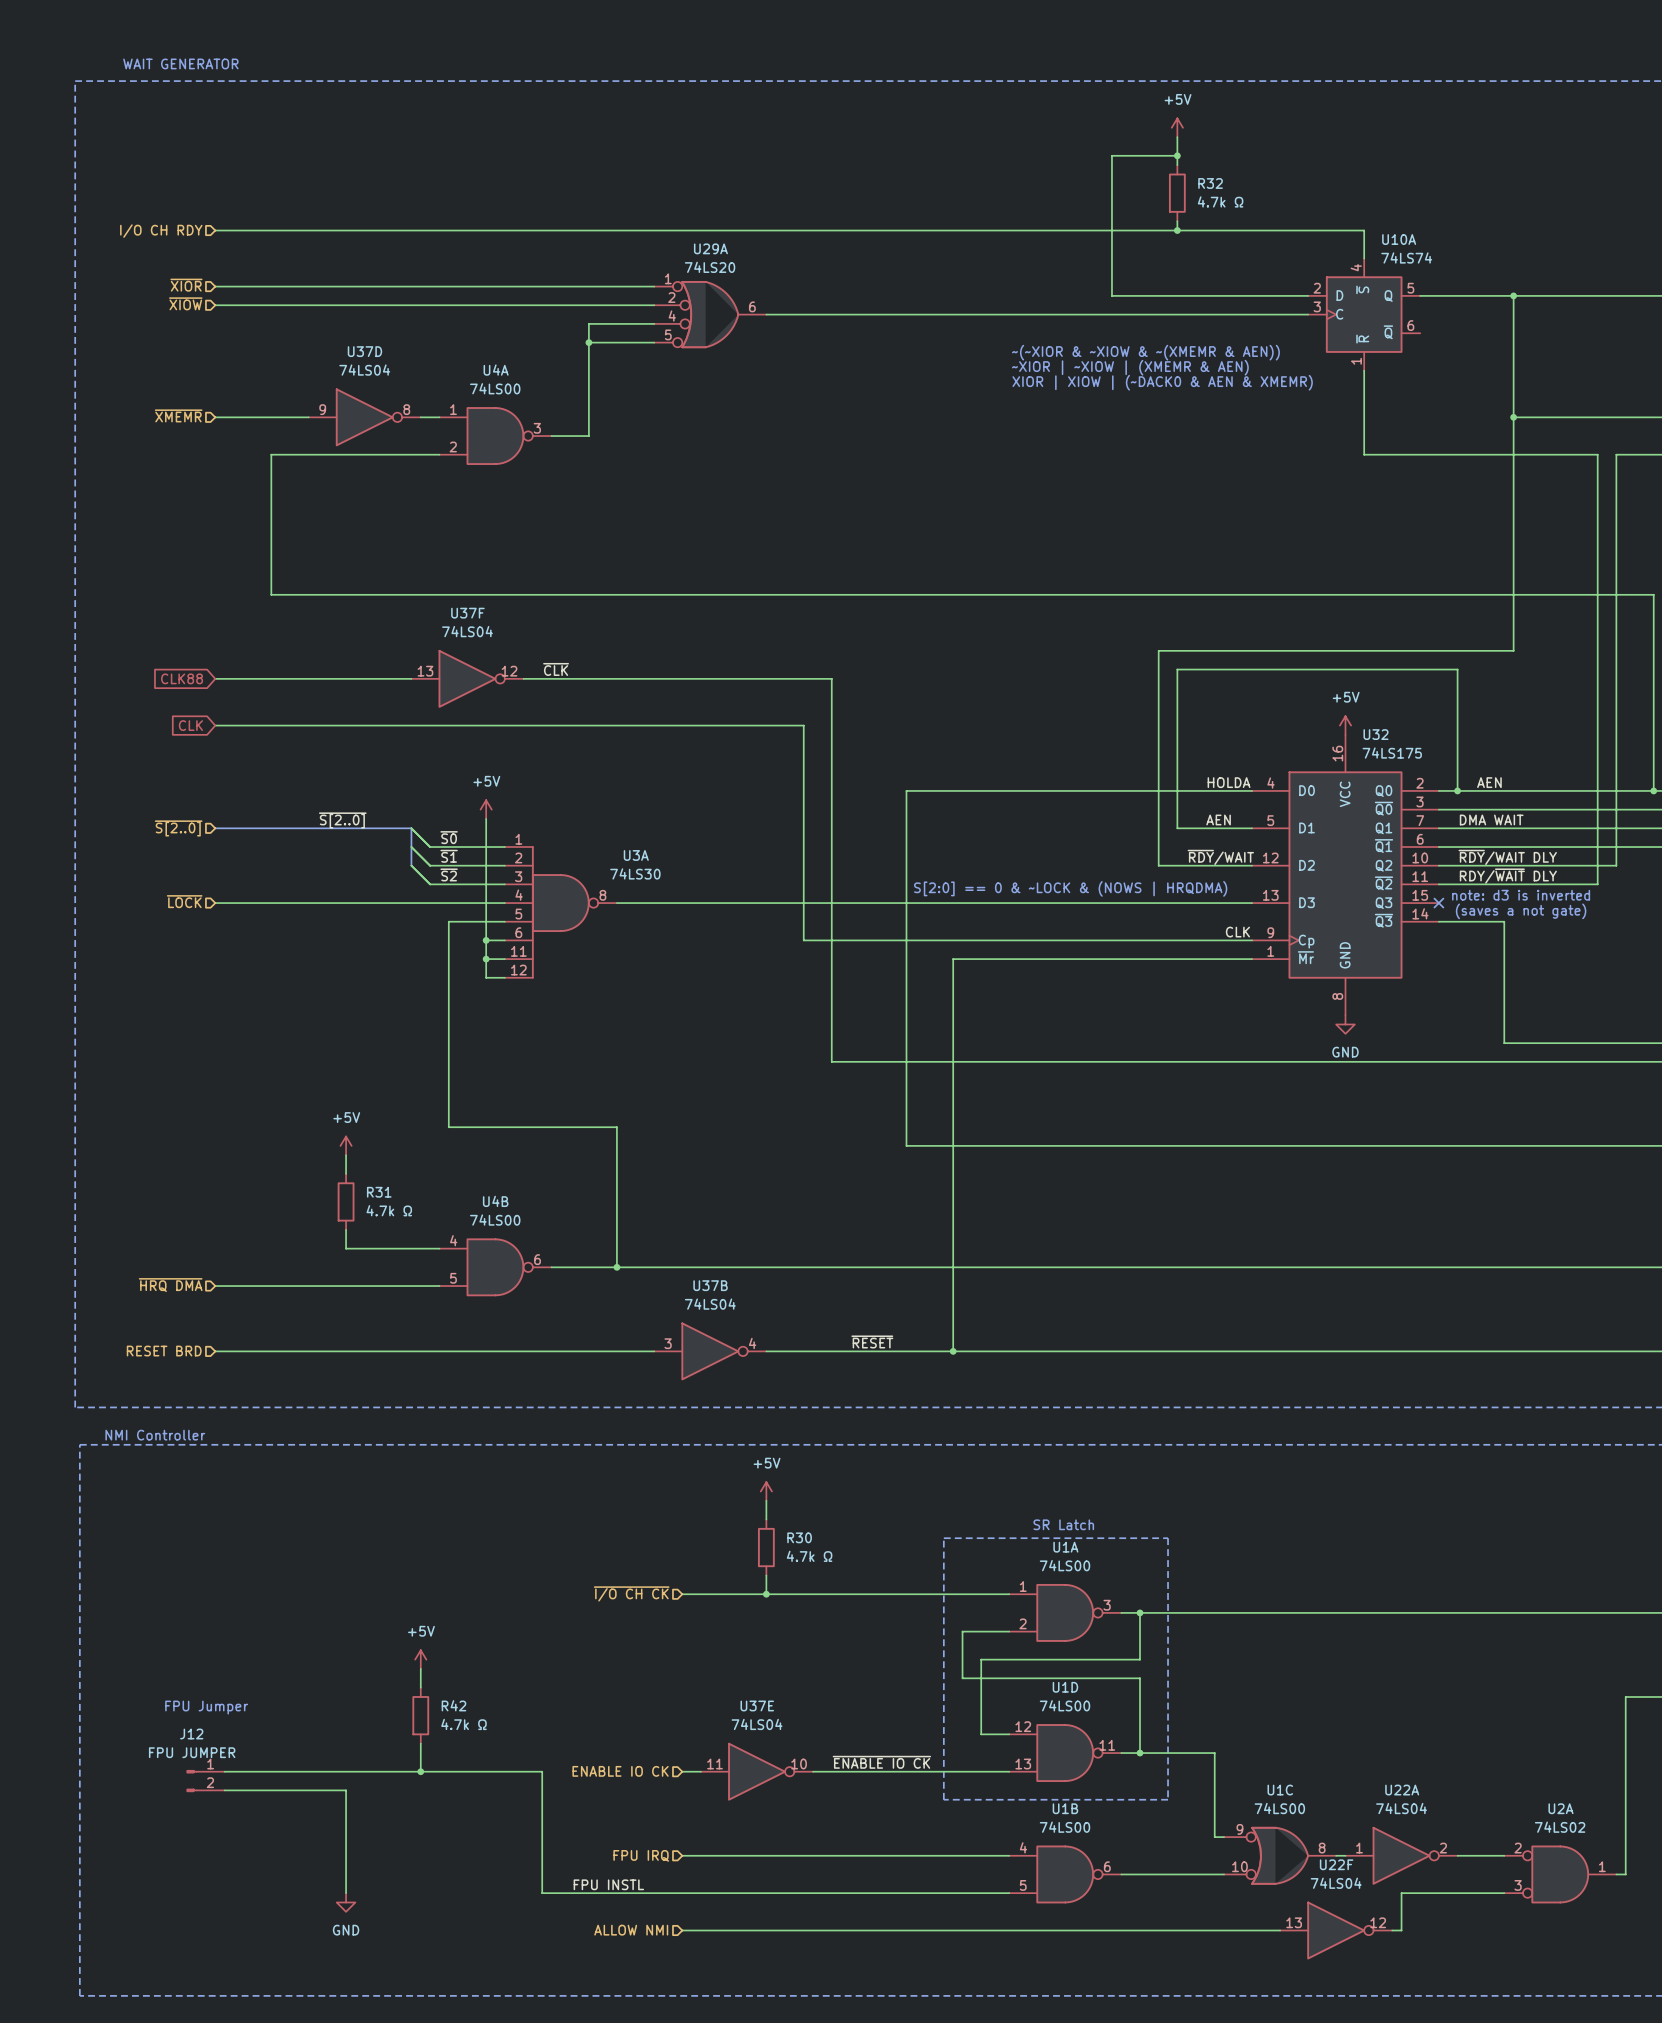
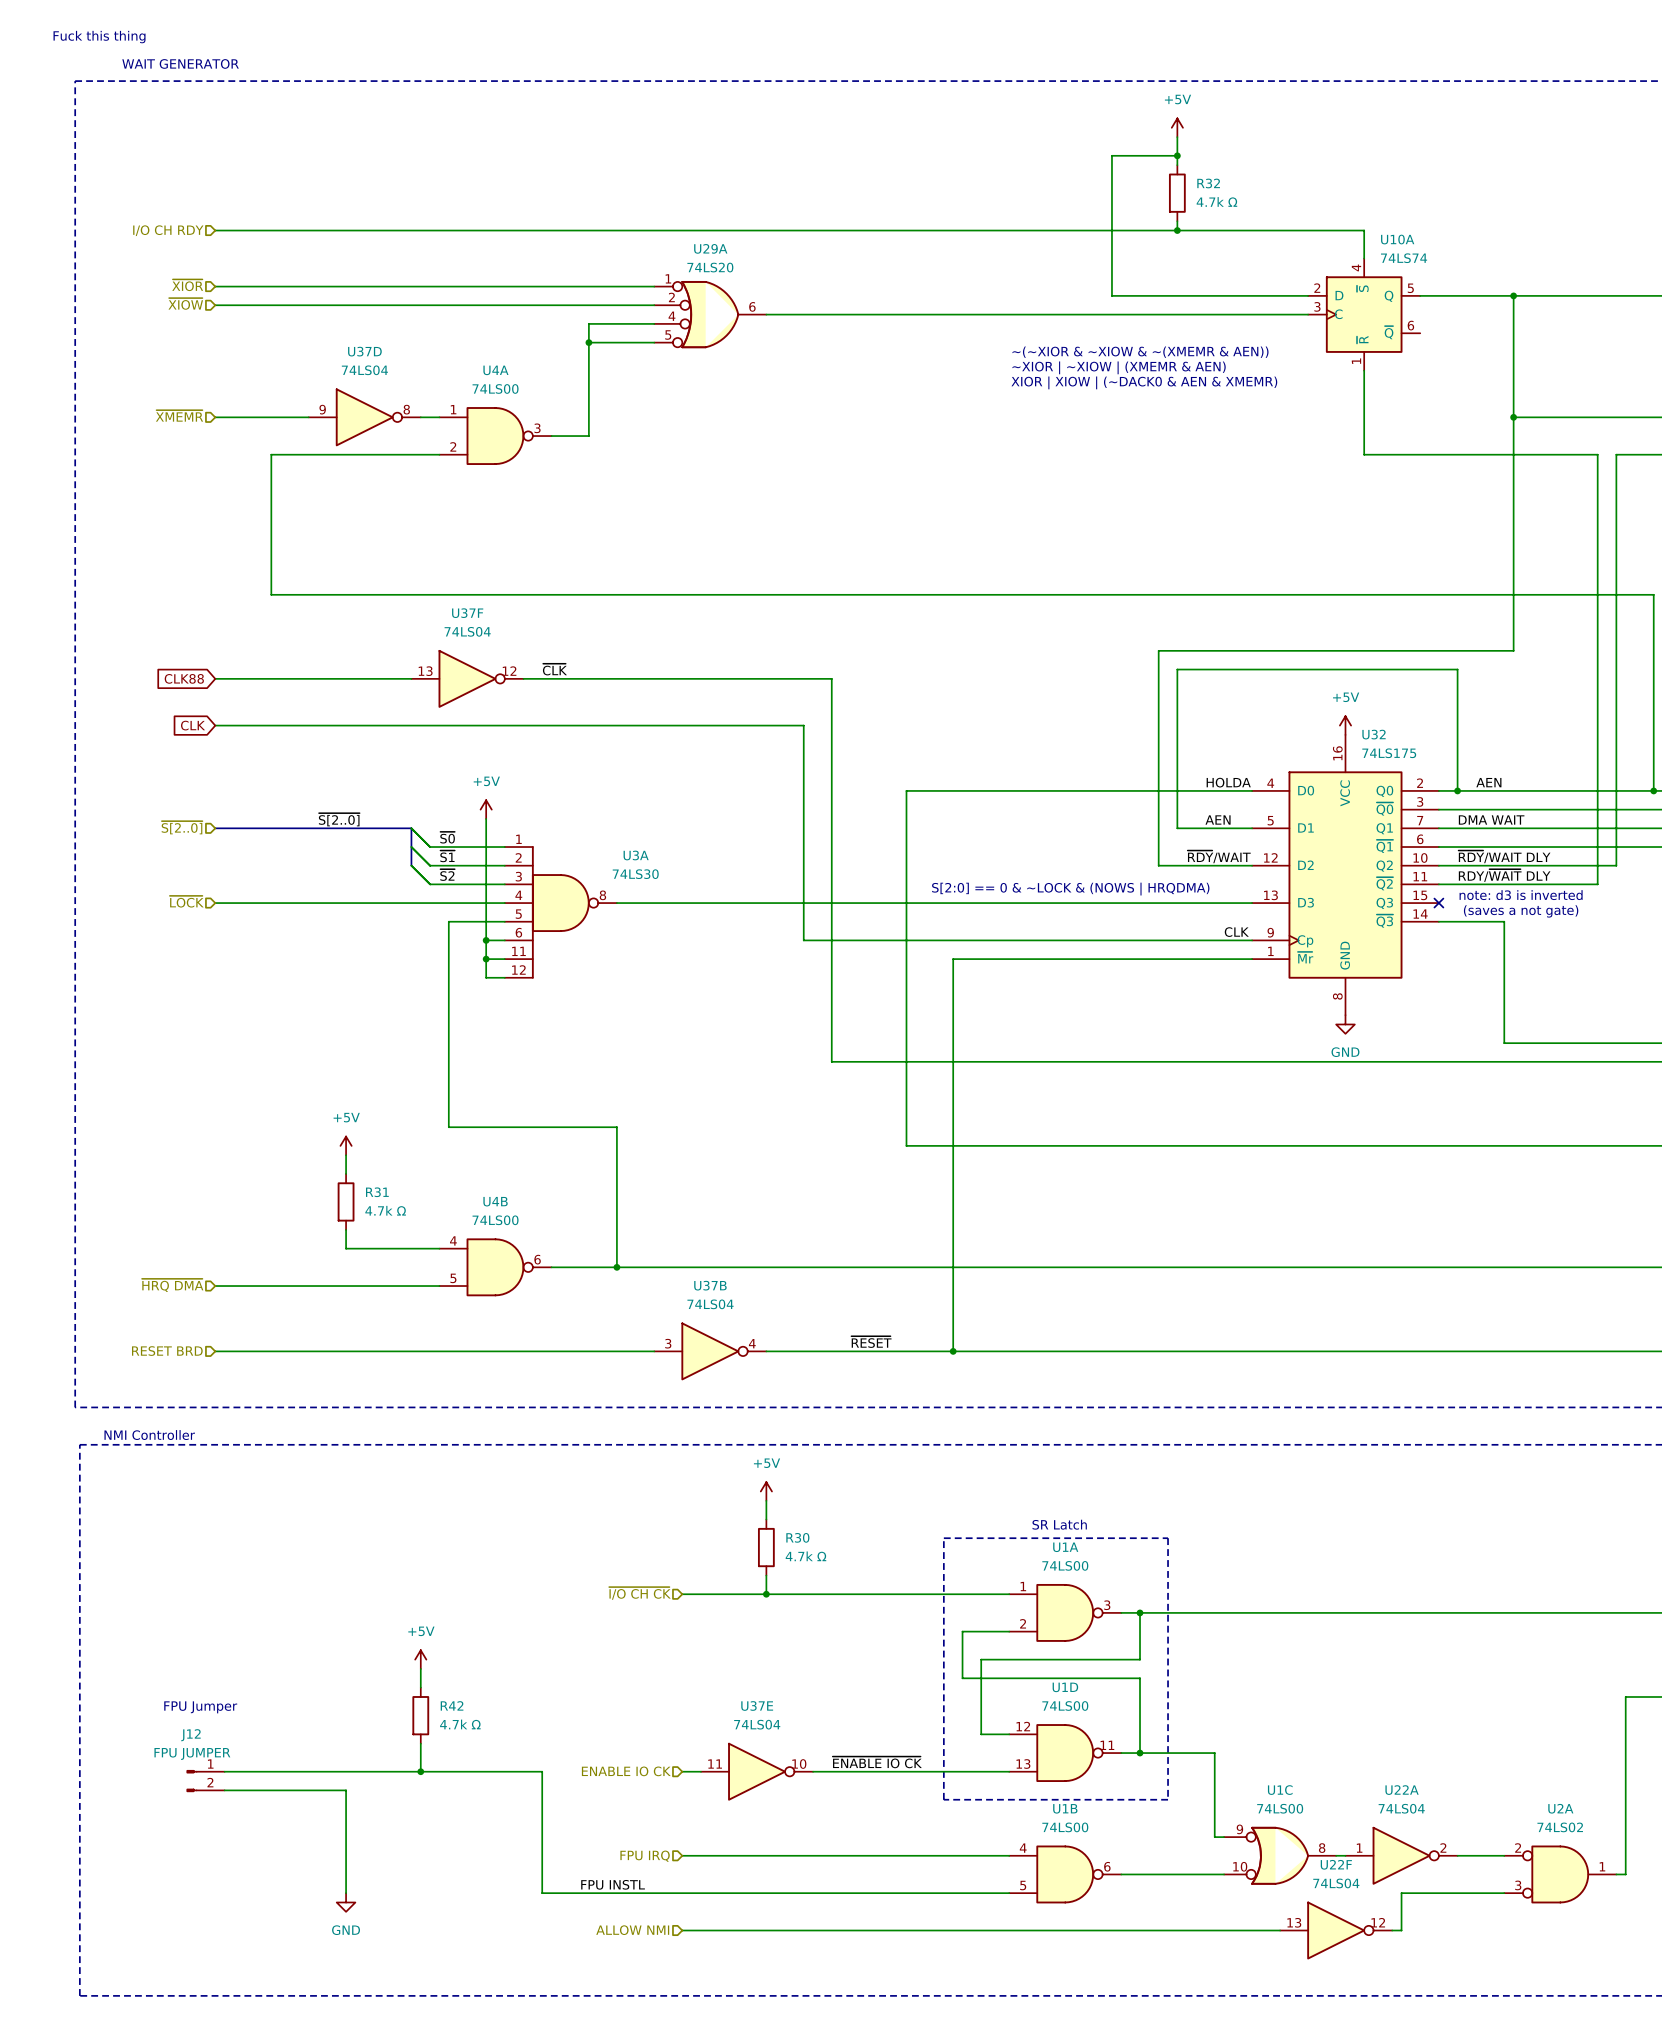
text: none -> Fuck this thing (99, 37)

